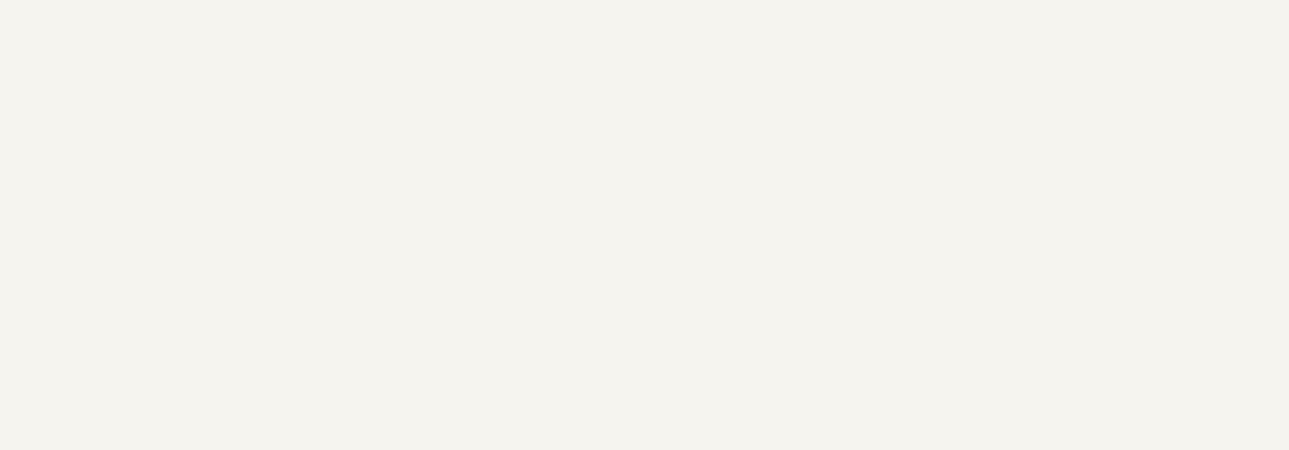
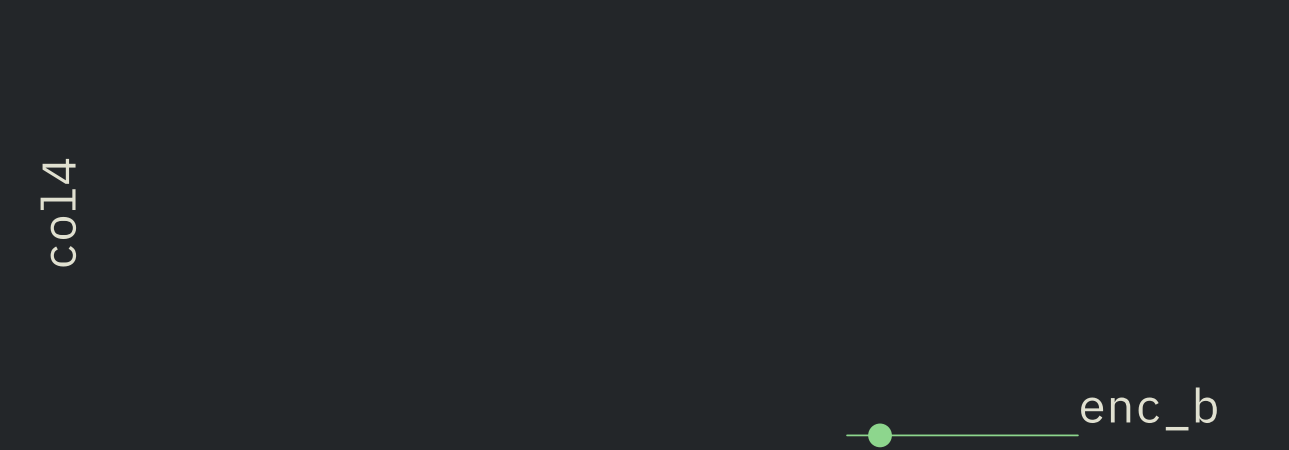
label: none -> col4 (58, 212)
label: none -> enc_b (1148, 408)
wire: none -> (847, 435) (1077, 435)
junction: none -> (880, 435)

